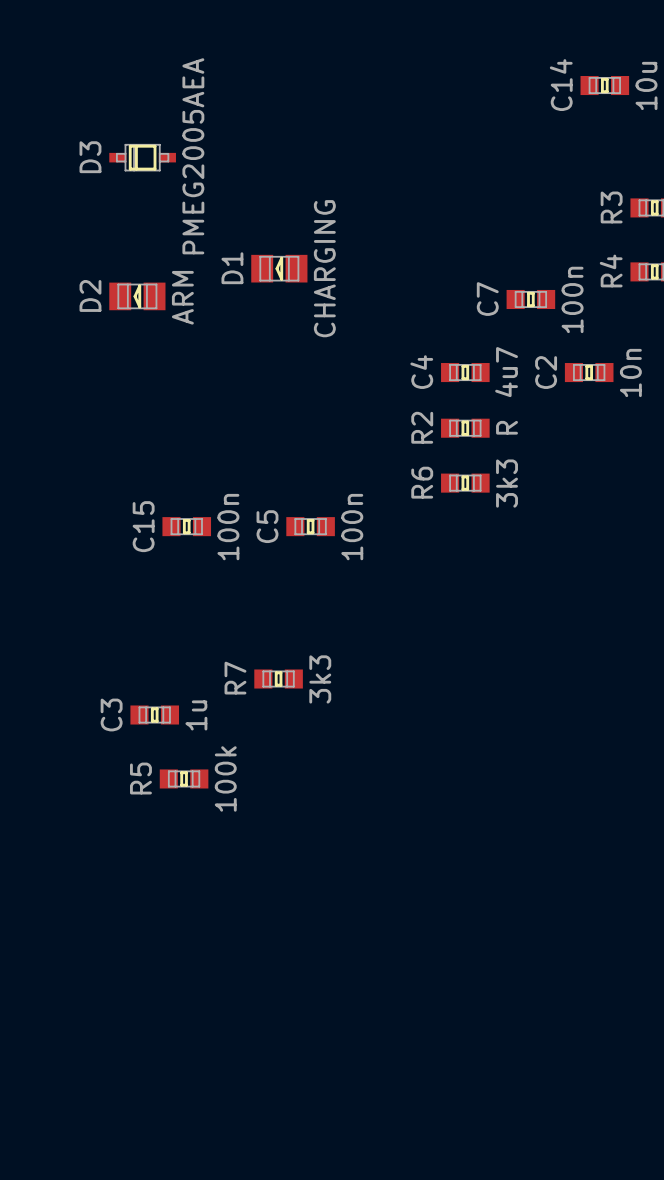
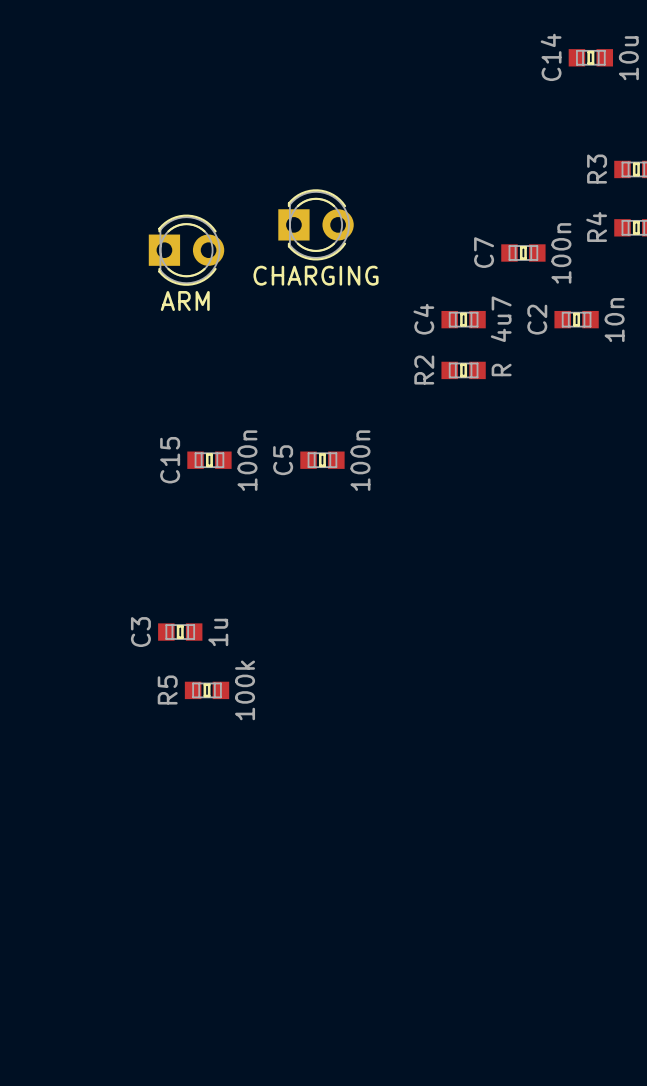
D3: PMEG2005AEA (142, 157) -> none
D1: CHARGING (279, 268) -> none
part: none -> CHARGING (316, 224)
D2: ARM (137, 296) -> none
part: none -> ARM (186, 250)
R6: 3k3 (465, 483) -> none
R7: 3k3 (278, 679) -> none

